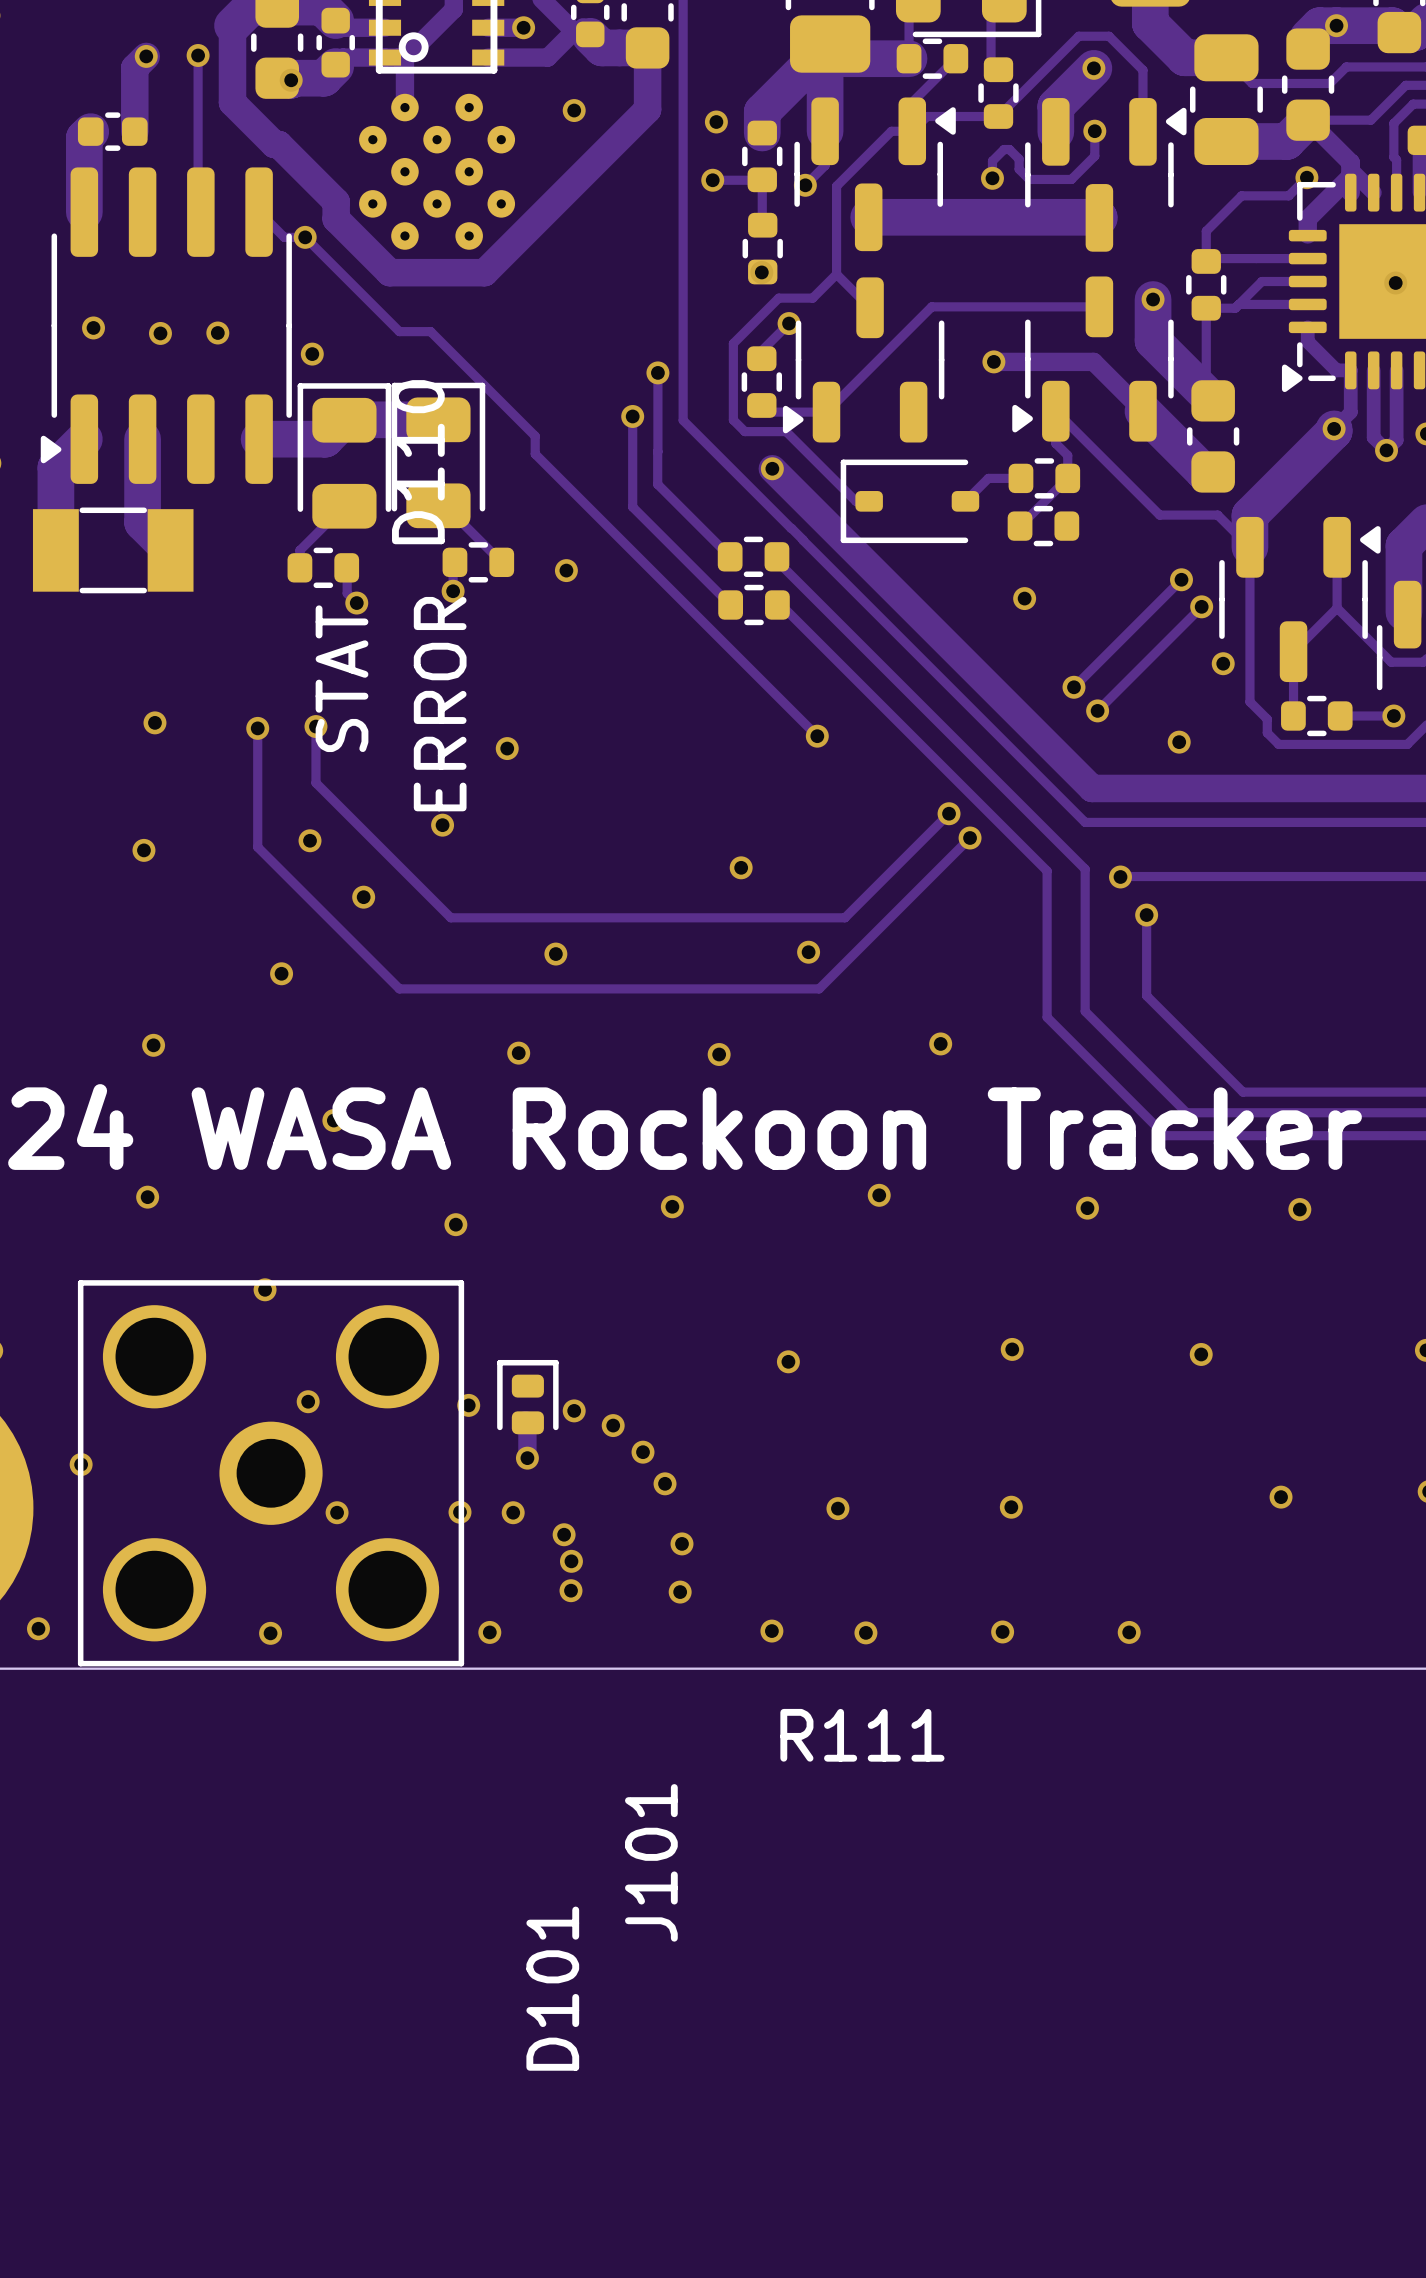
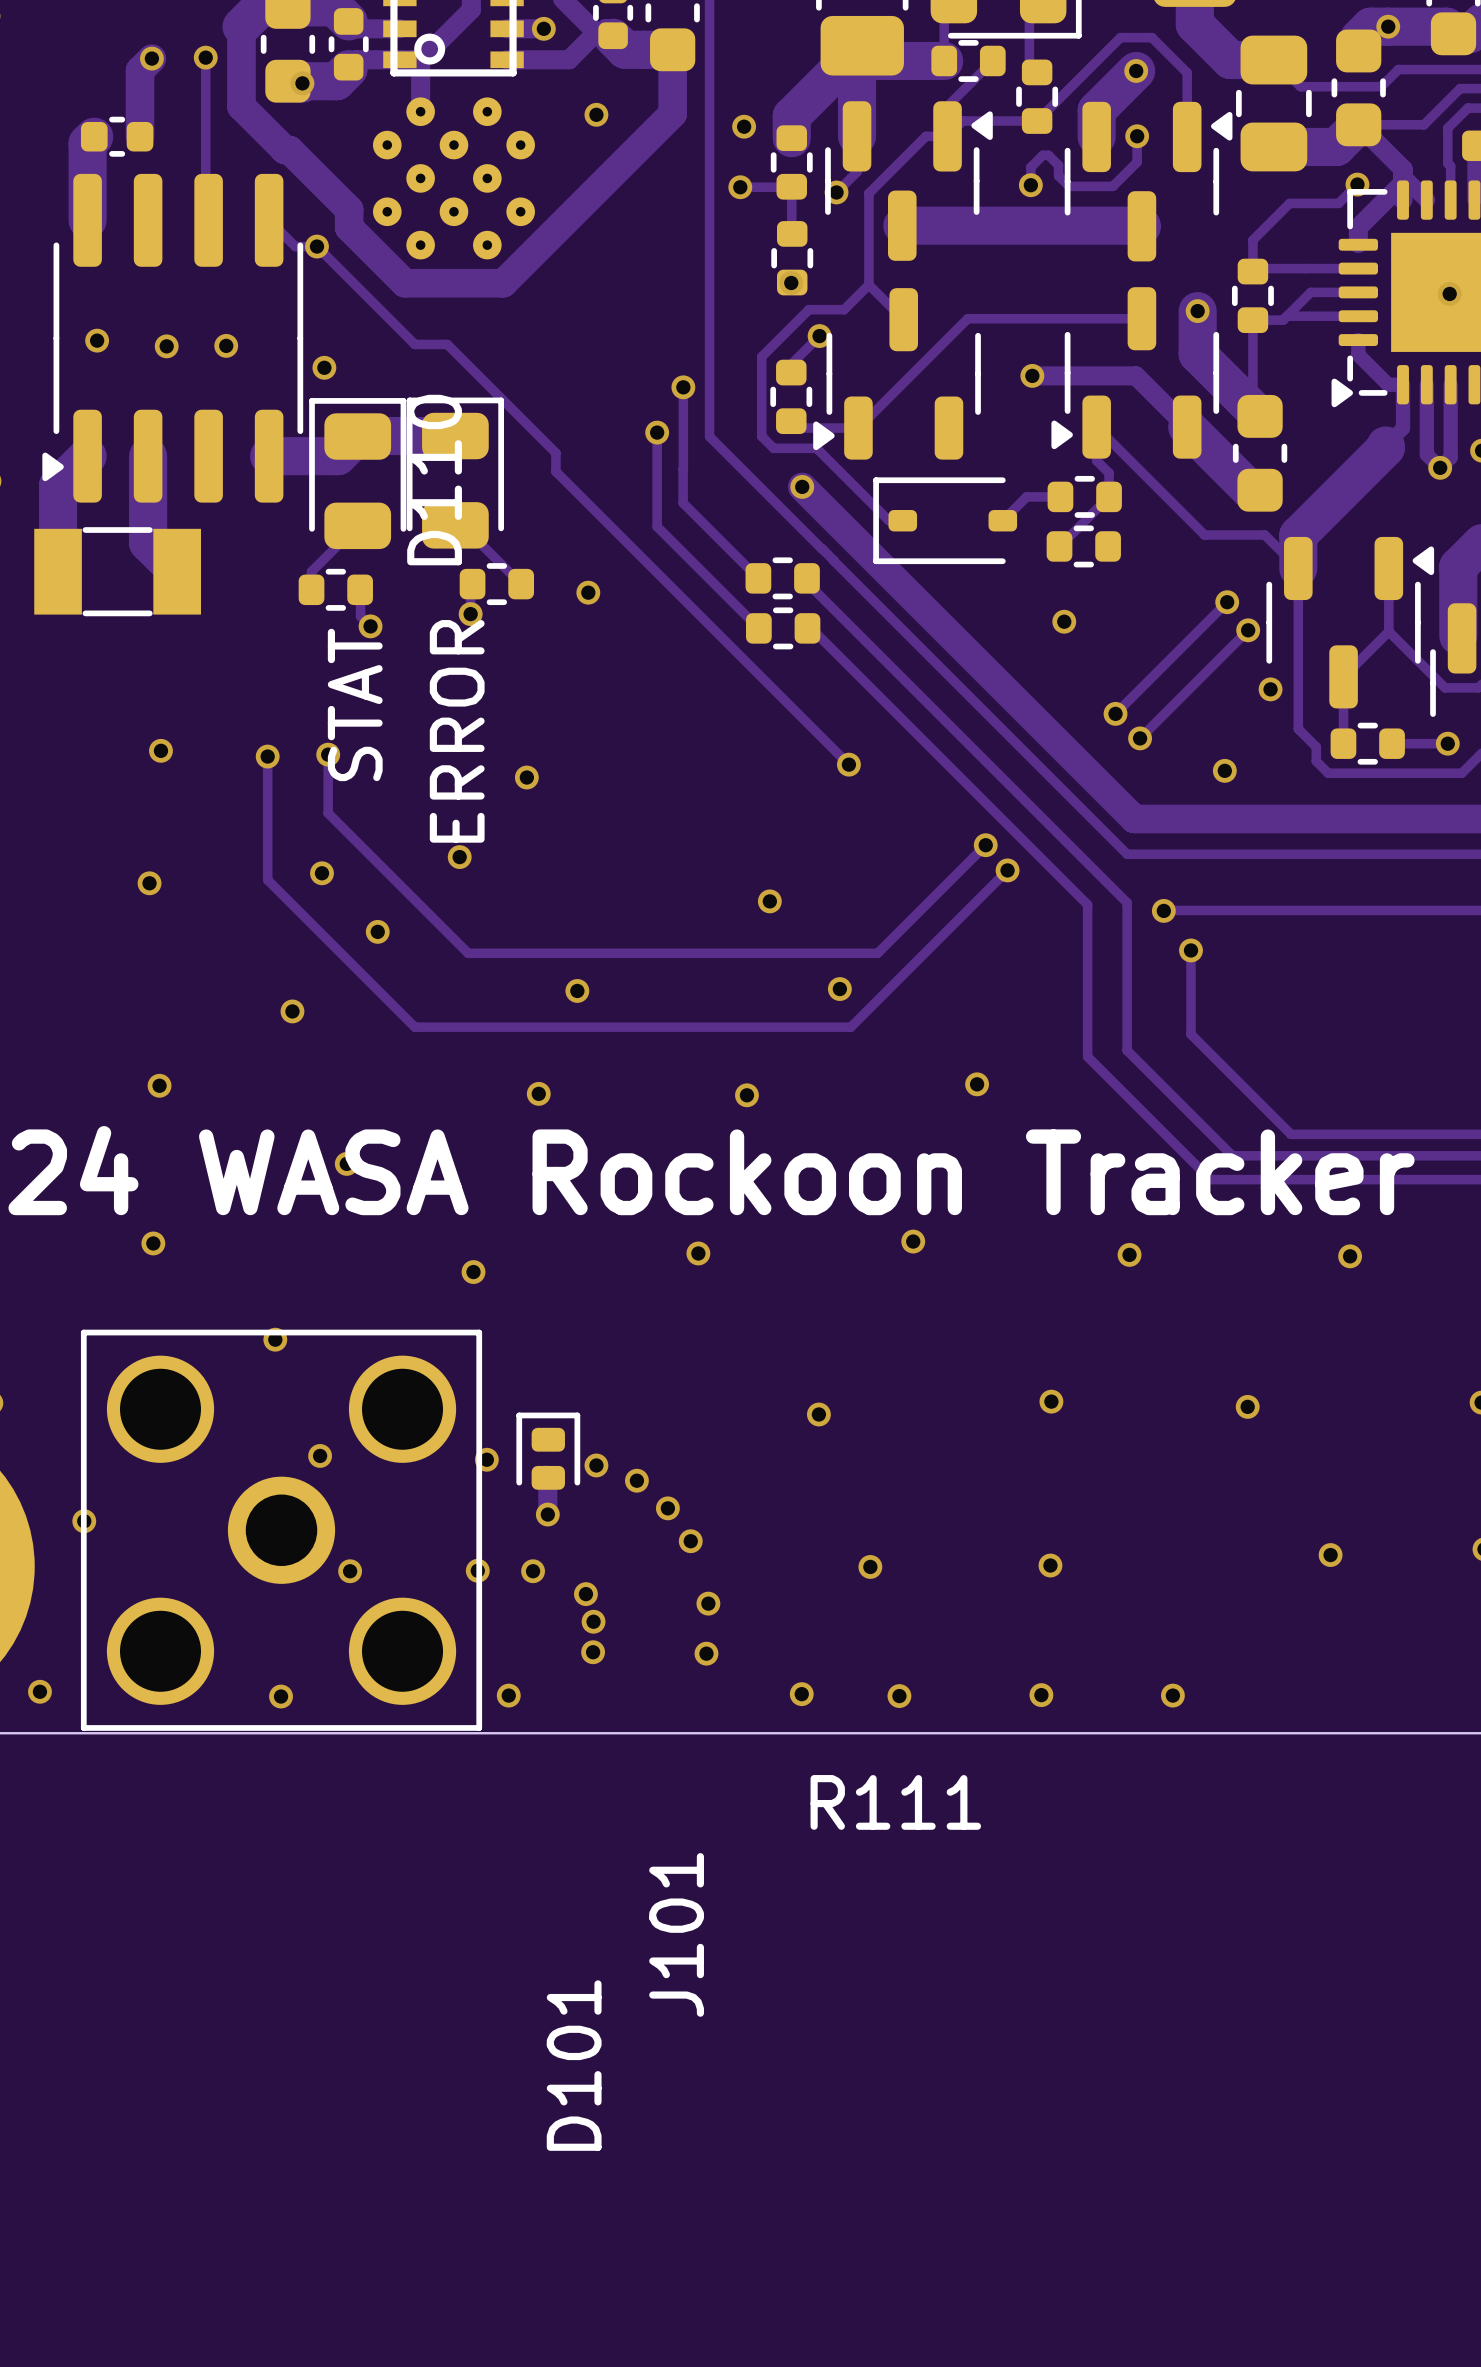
via: (1334, 428) -> none

